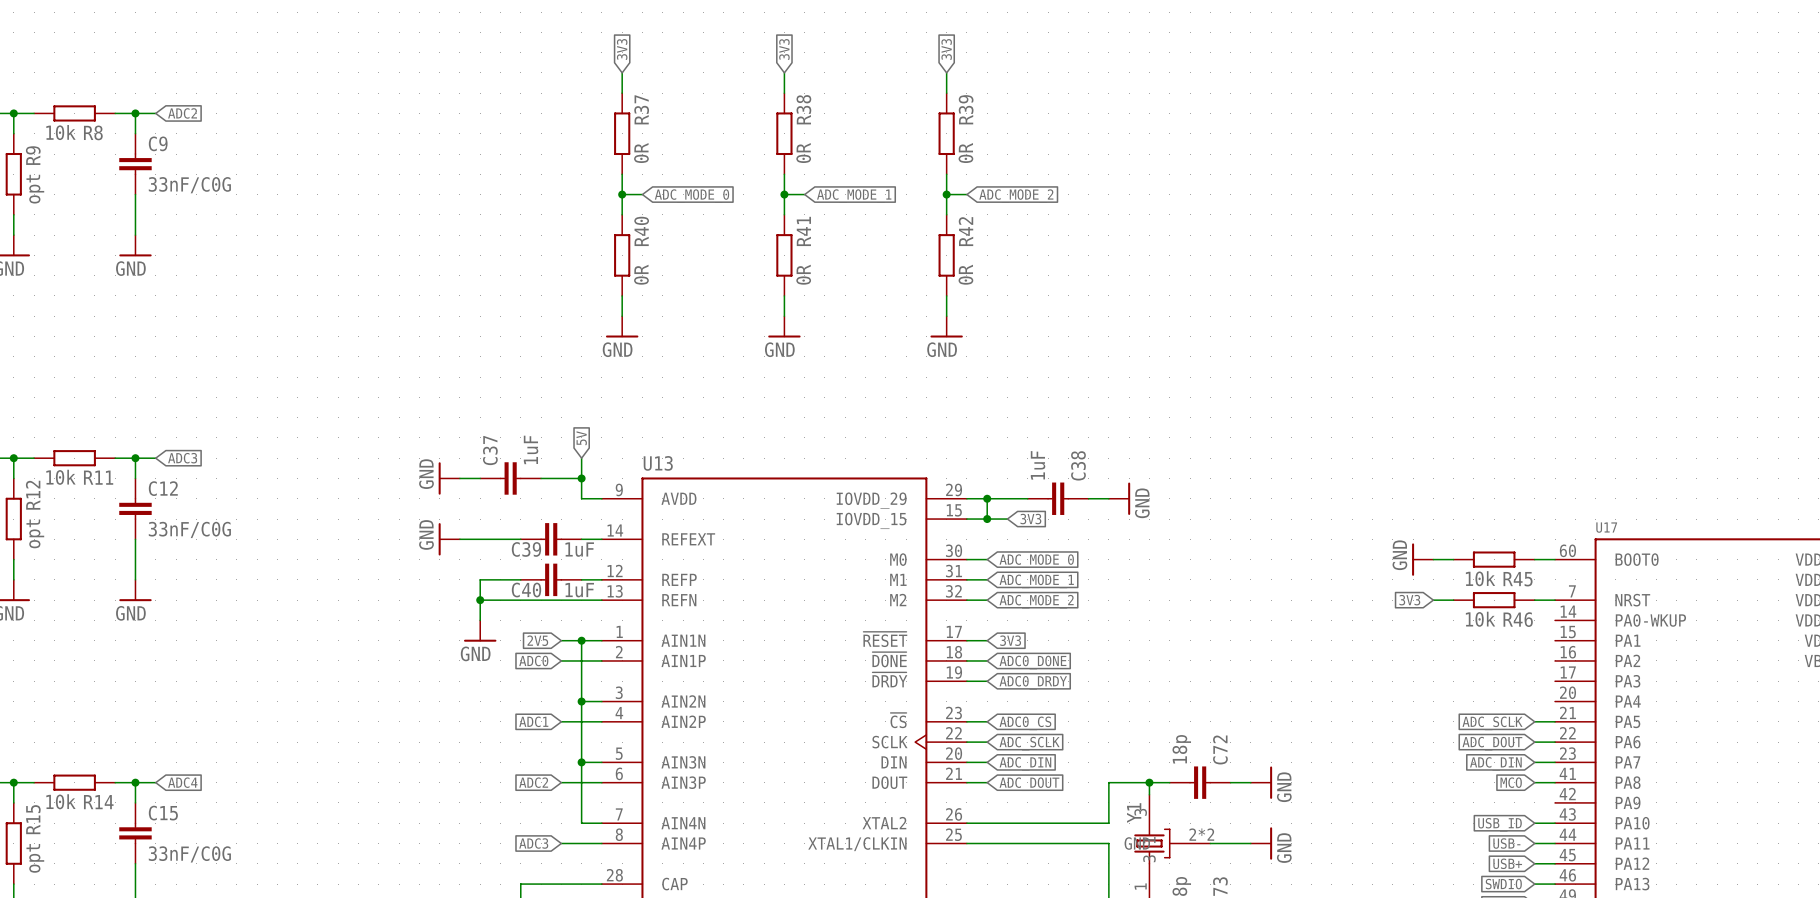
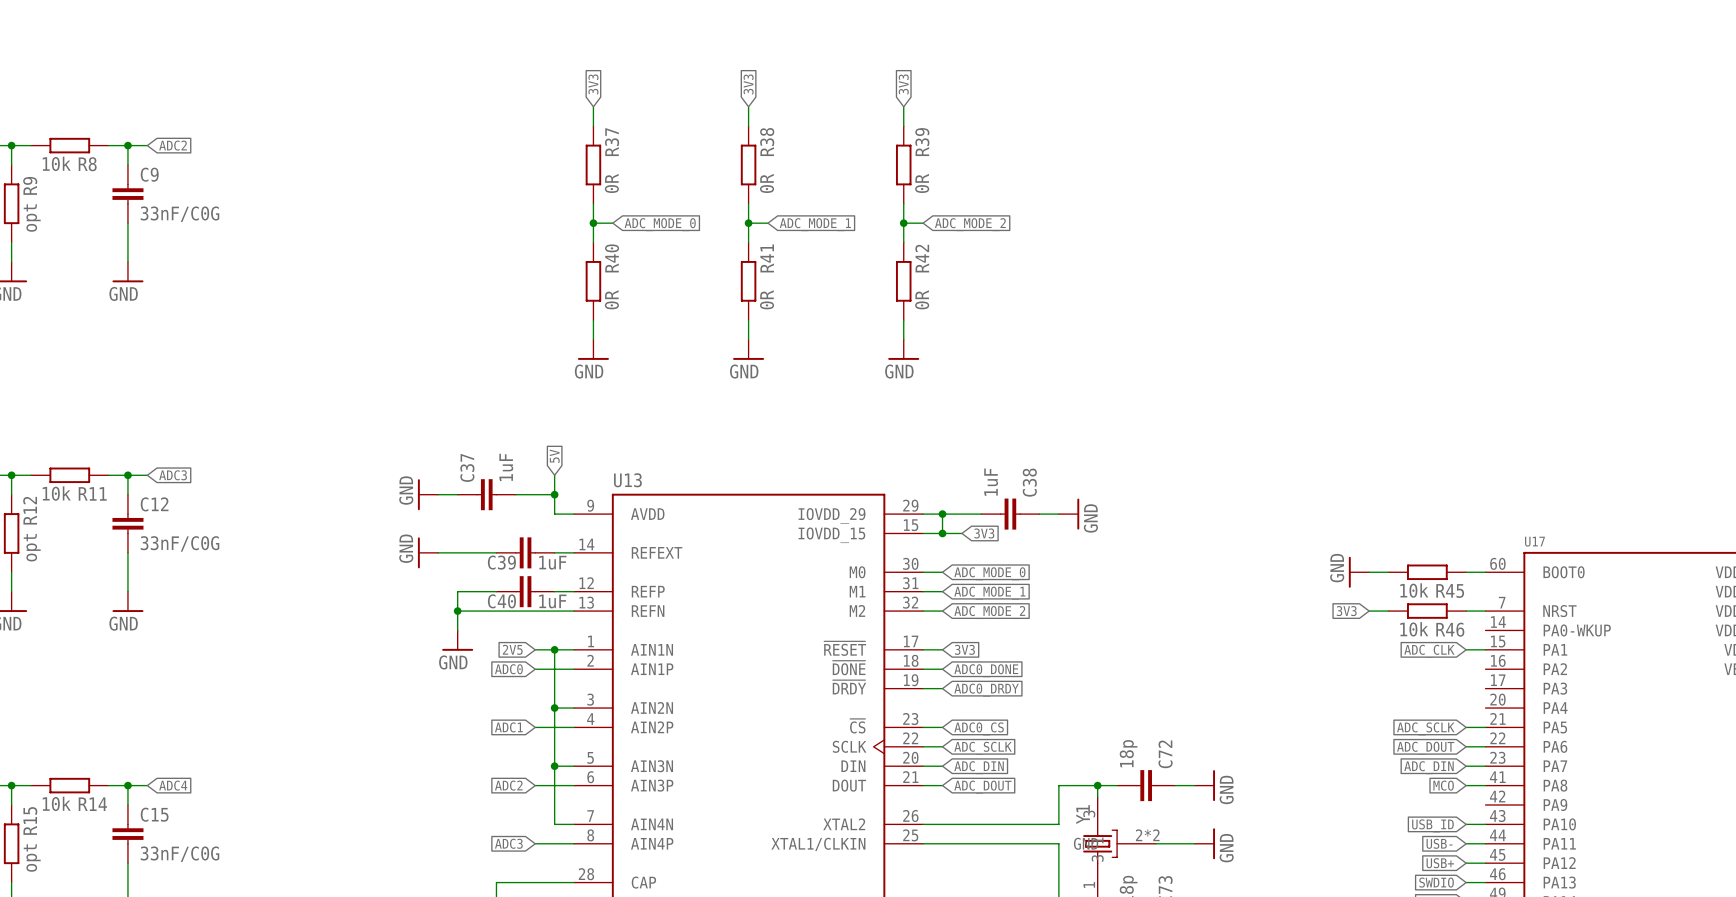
wire: none -> (1466, 649) (1485, 649)
global label: none -> ADC_CLK (1429, 651)

